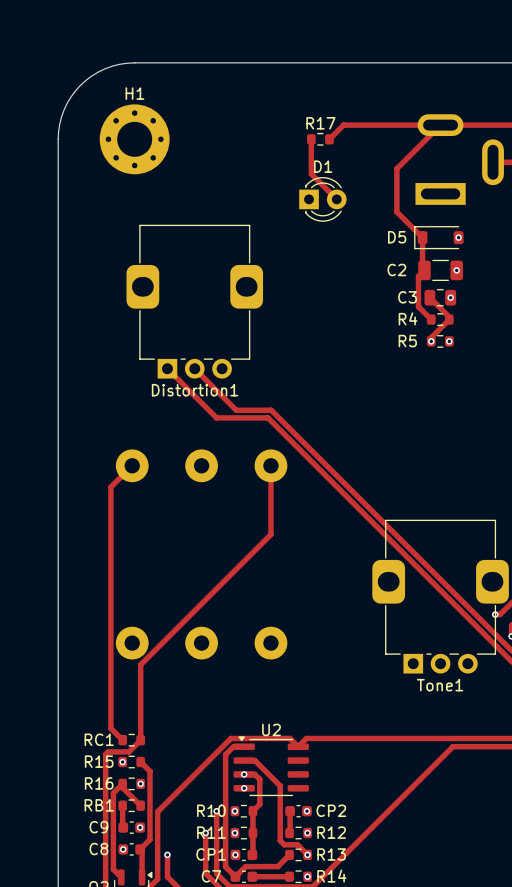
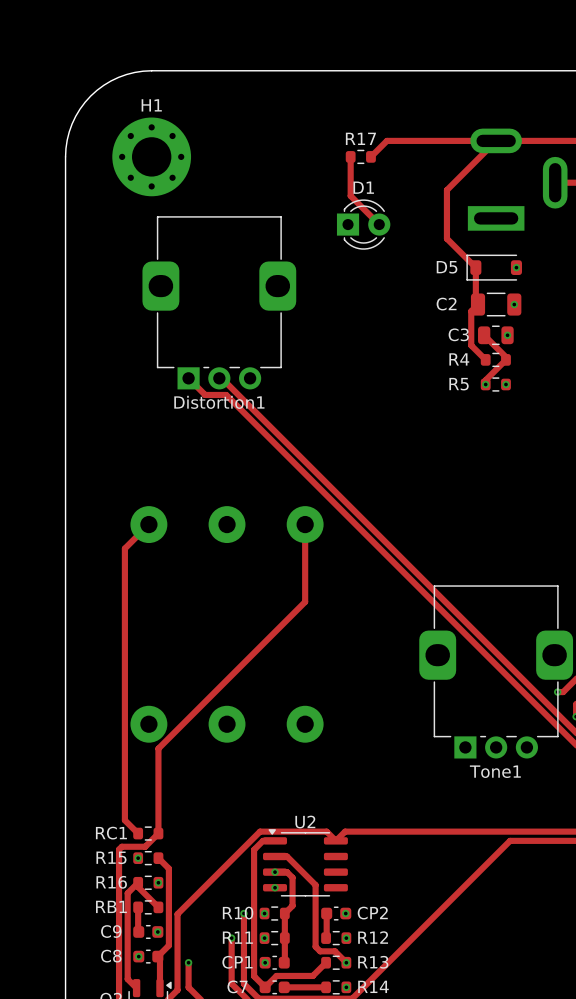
Distortion1 position: (194, 301) -> (219, 302)
track: (167, 368) (216, 417) (268, 417) -> (188, 378) (205, 394) (226, 394) (301, 470)
track: (194, 368) (236, 410) (271, 410) -> (221, 378) (305, 461)

